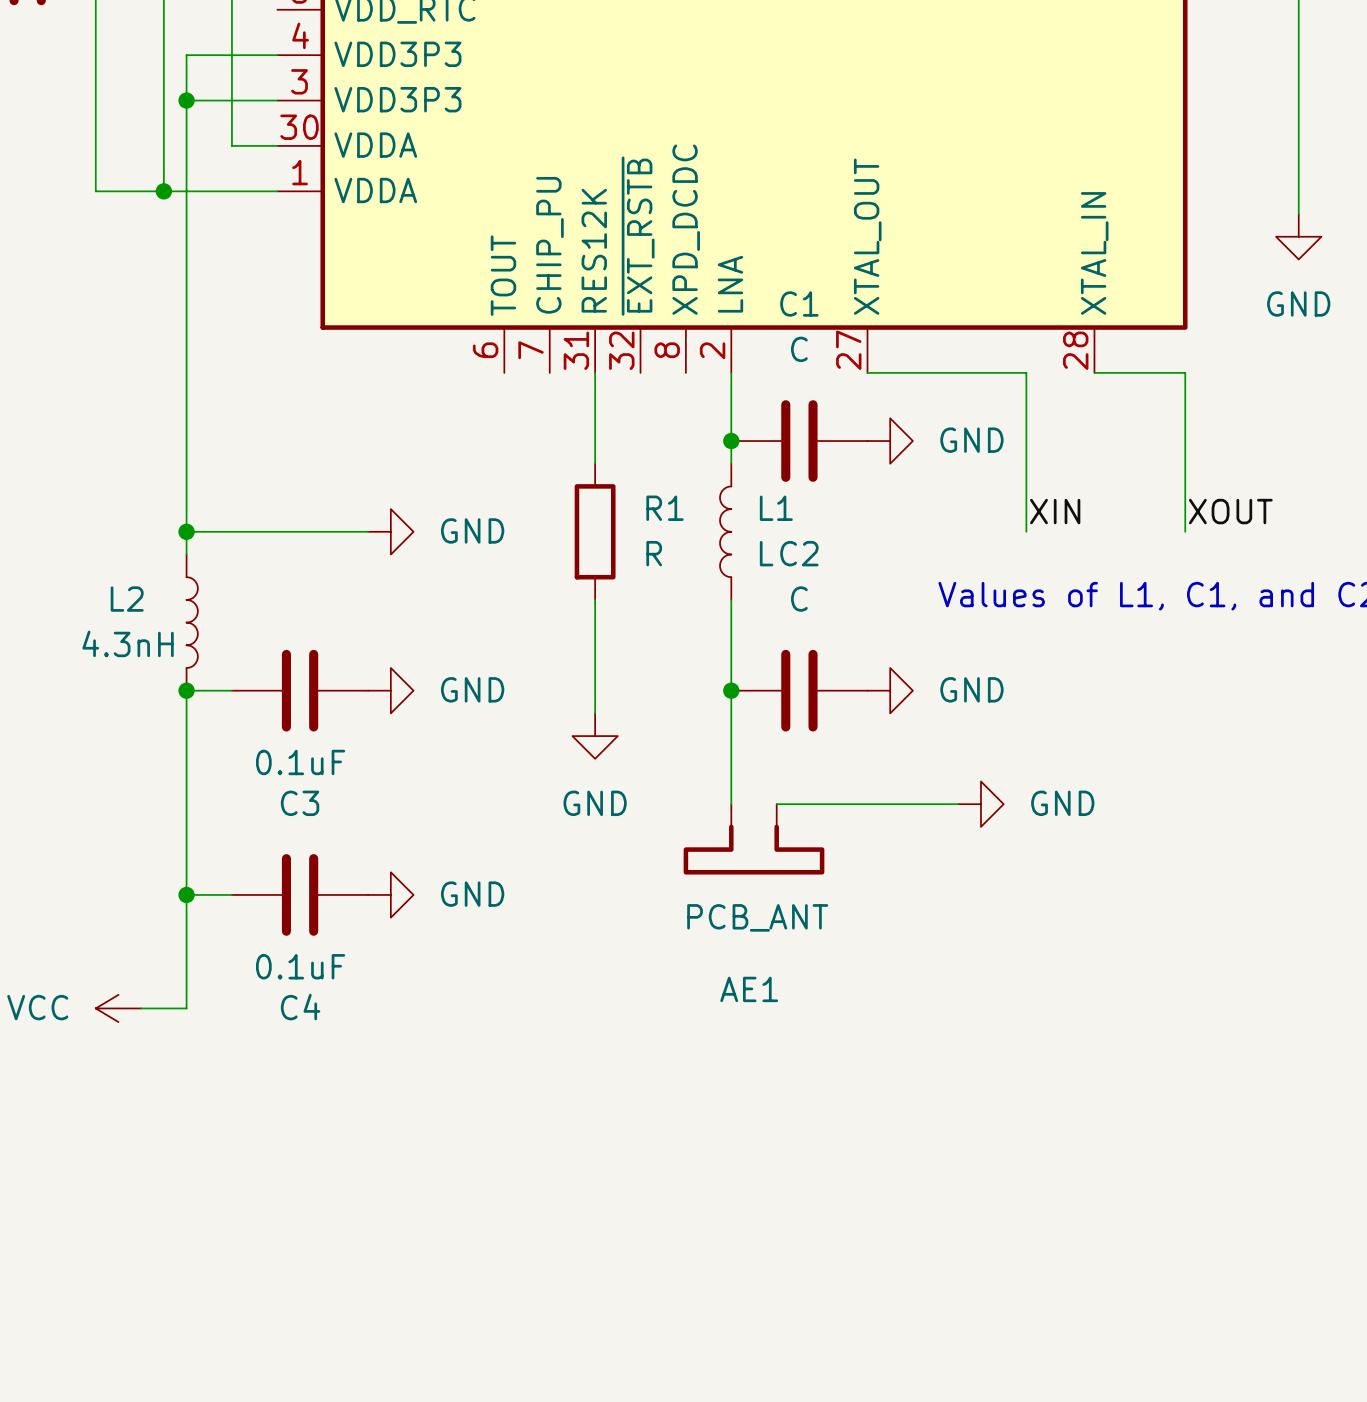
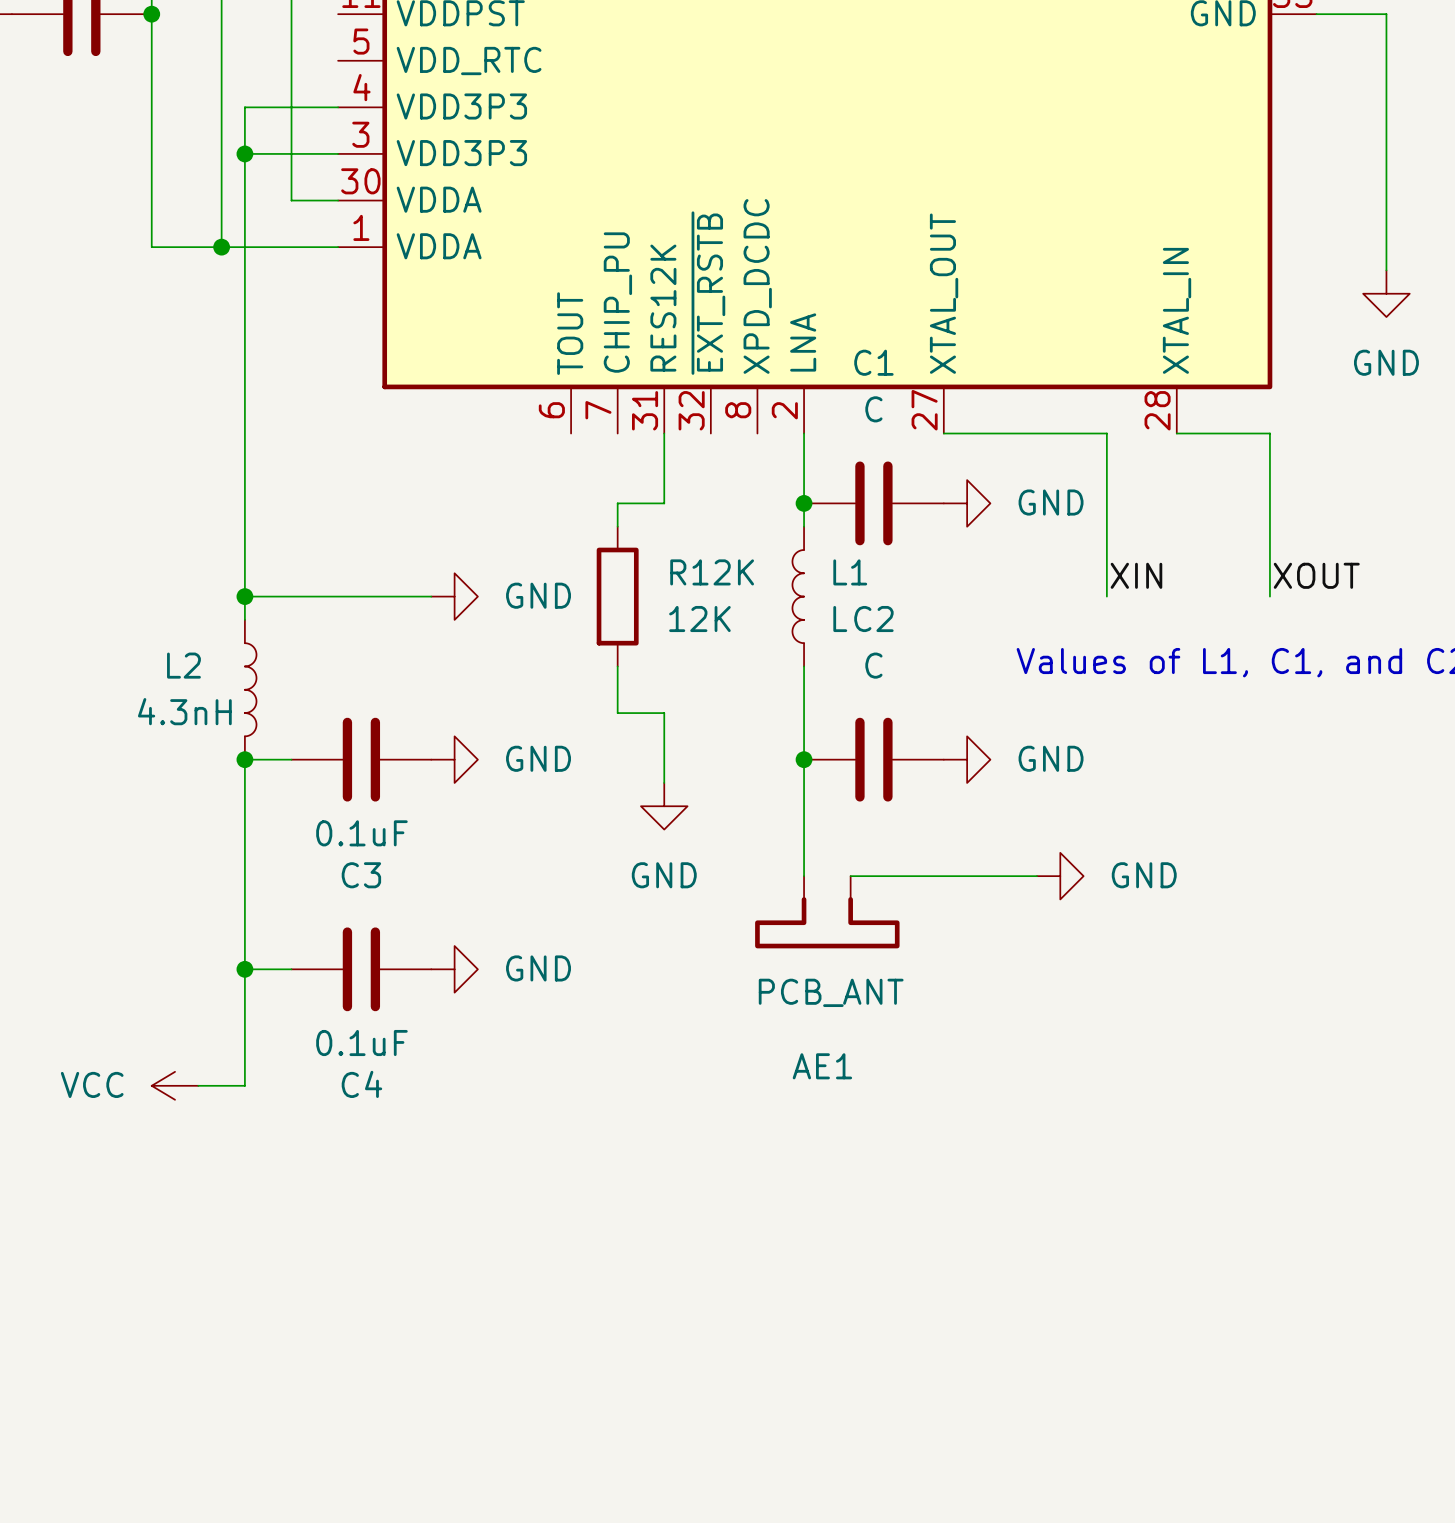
wire: (595, 441) (595, 463) -> (664, 503) (617, 503) (617, 526)
R12K: none -> 12K (617, 596)
R1: R (595, 531) -> none
wire: (595, 599) (595, 645) -> (617, 666) (617, 713) (664, 713)

